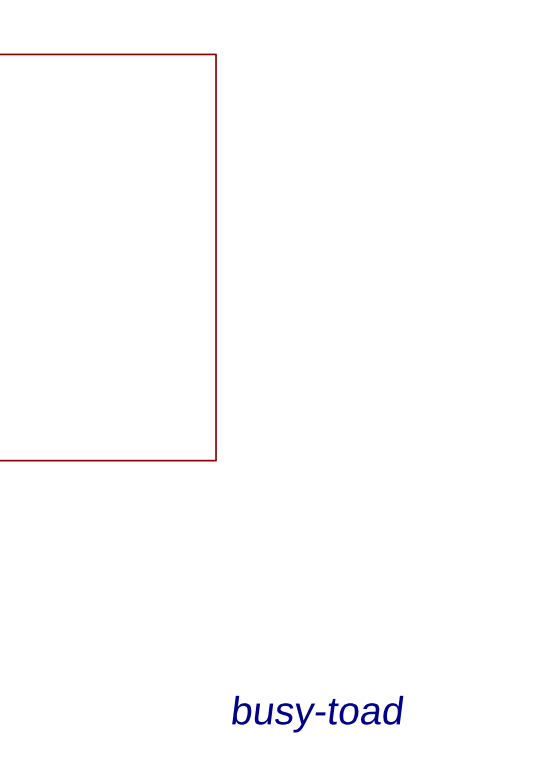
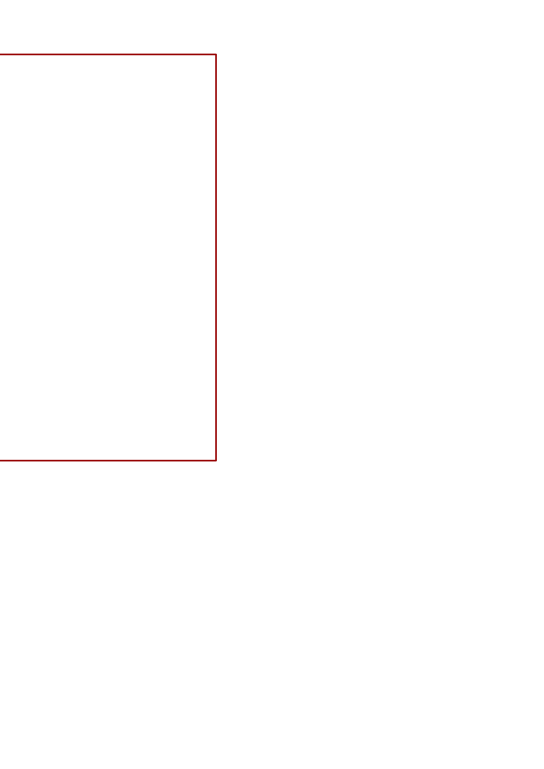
text: busy-toad (317, 714) -> none

